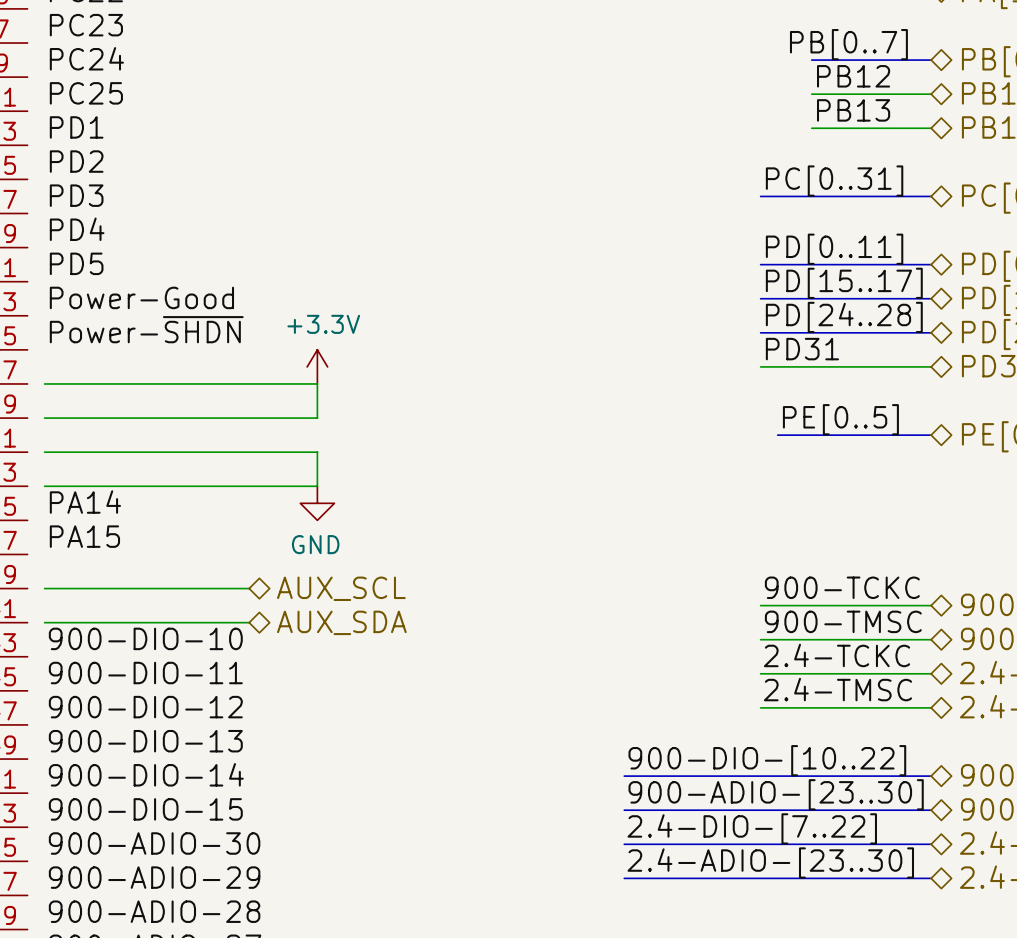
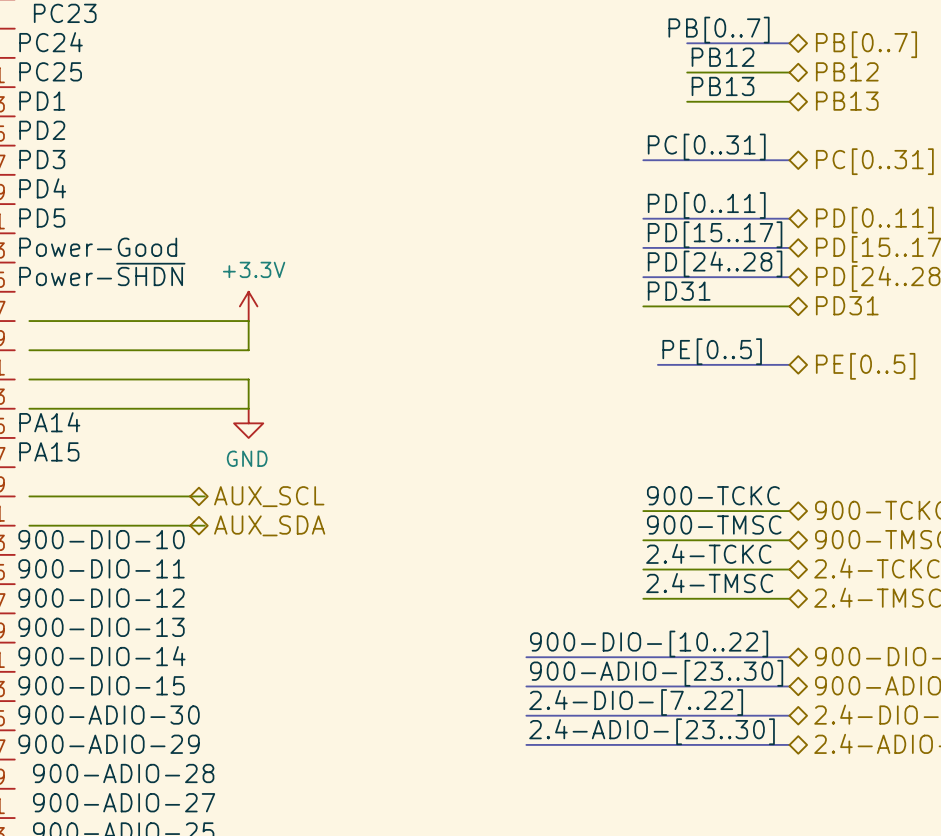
label position: PC24 (86, 58) -> PC24 (51, 42)
label position: PC25 (86, 93) -> PC25 (50, 71)
label position: PD1 (76, 127) -> PD1 (42, 101)
label position: PD2 (76, 161) -> PD2 (42, 130)
label position: PD3 (76, 195) -> PD3 (42, 159)
label position: PD4 (77, 229) -> PD4 (42, 188)
label position: PD5 (76, 263) -> PD5 (42, 218)
label position: Power-Good (141, 297) -> Power-Good (98, 247)
label position: Power-~{SHDN} (146, 329) -> Power-~{SHDN} (102, 274)
power symbol position: +3.3V (317, 366) -> +3.3V (248, 306)
wire: (300, 383) (317, 383) (317, 418) (300, 418) -> (248, 321) (248, 350)
wire: (300, 452) (317, 452) (317, 486) (300, 486) -> (248, 379) (248, 408)
label position: PA14 (85, 502) -> PA14 (49, 422)
power symbol position: GND (317, 503) -> GND (248, 423)
label position: PA15 (84, 536) -> PA15 (49, 451)
hierarchical label position: AUX_SCL (341, 588) -> AUX_SCL (269, 496)
hierarchical label position: AUX_SDA (341, 622) -> AUX_SDA (269, 525)
label position: 900-DIO-10 (145, 638) -> 900-DIO-10 (101, 539)
label position: 900-DIO-11 (145, 673) -> 900-DIO-11 (101, 568)
label position: 900-DIO-12 (145, 707) -> 900-DIO-12 (101, 598)
label position: 900-DIO-13 (145, 741) -> 900-DIO-13 (101, 627)
label position: 900-DIO-14 (146, 774) -> 900-DIO-14 (101, 656)
label position: 900-DIO-15 (145, 809) -> 900-DIO-15 (101, 685)
label position: 900-ADIO-30 (154, 843) -> 900-ADIO-30 (109, 715)
label position: 900-ADIO-29 (154, 877) -> 900-ADIO-29 (109, 744)

